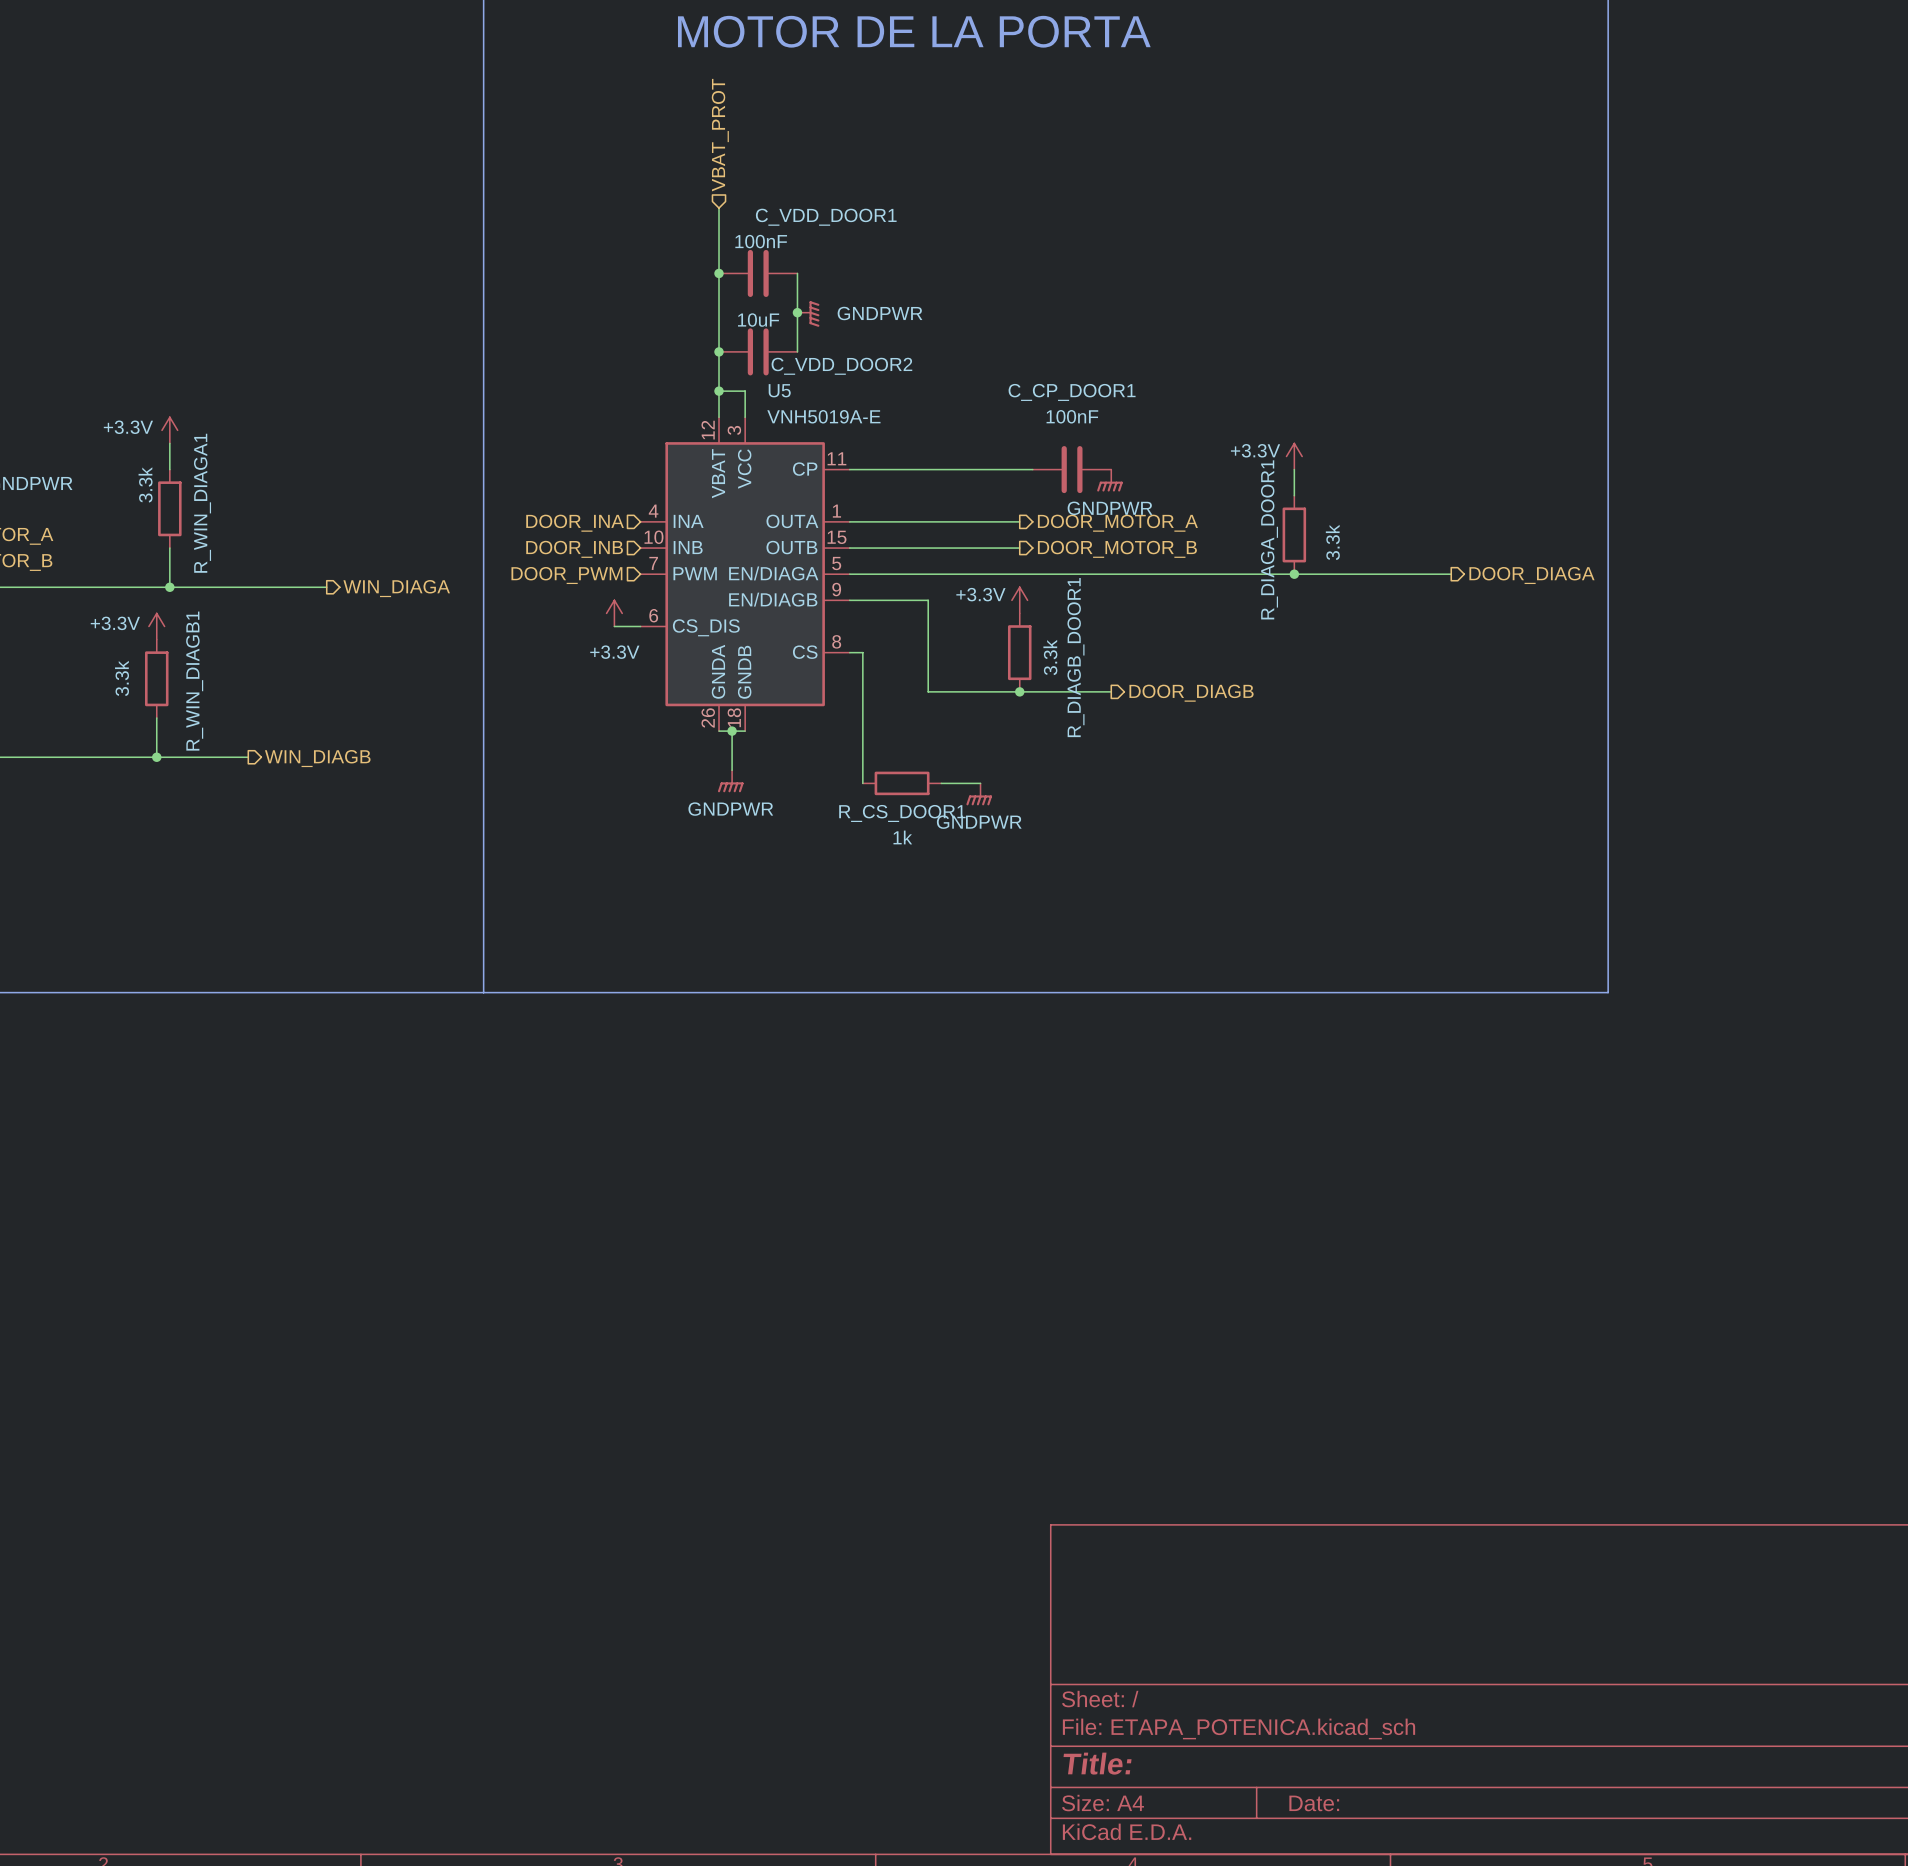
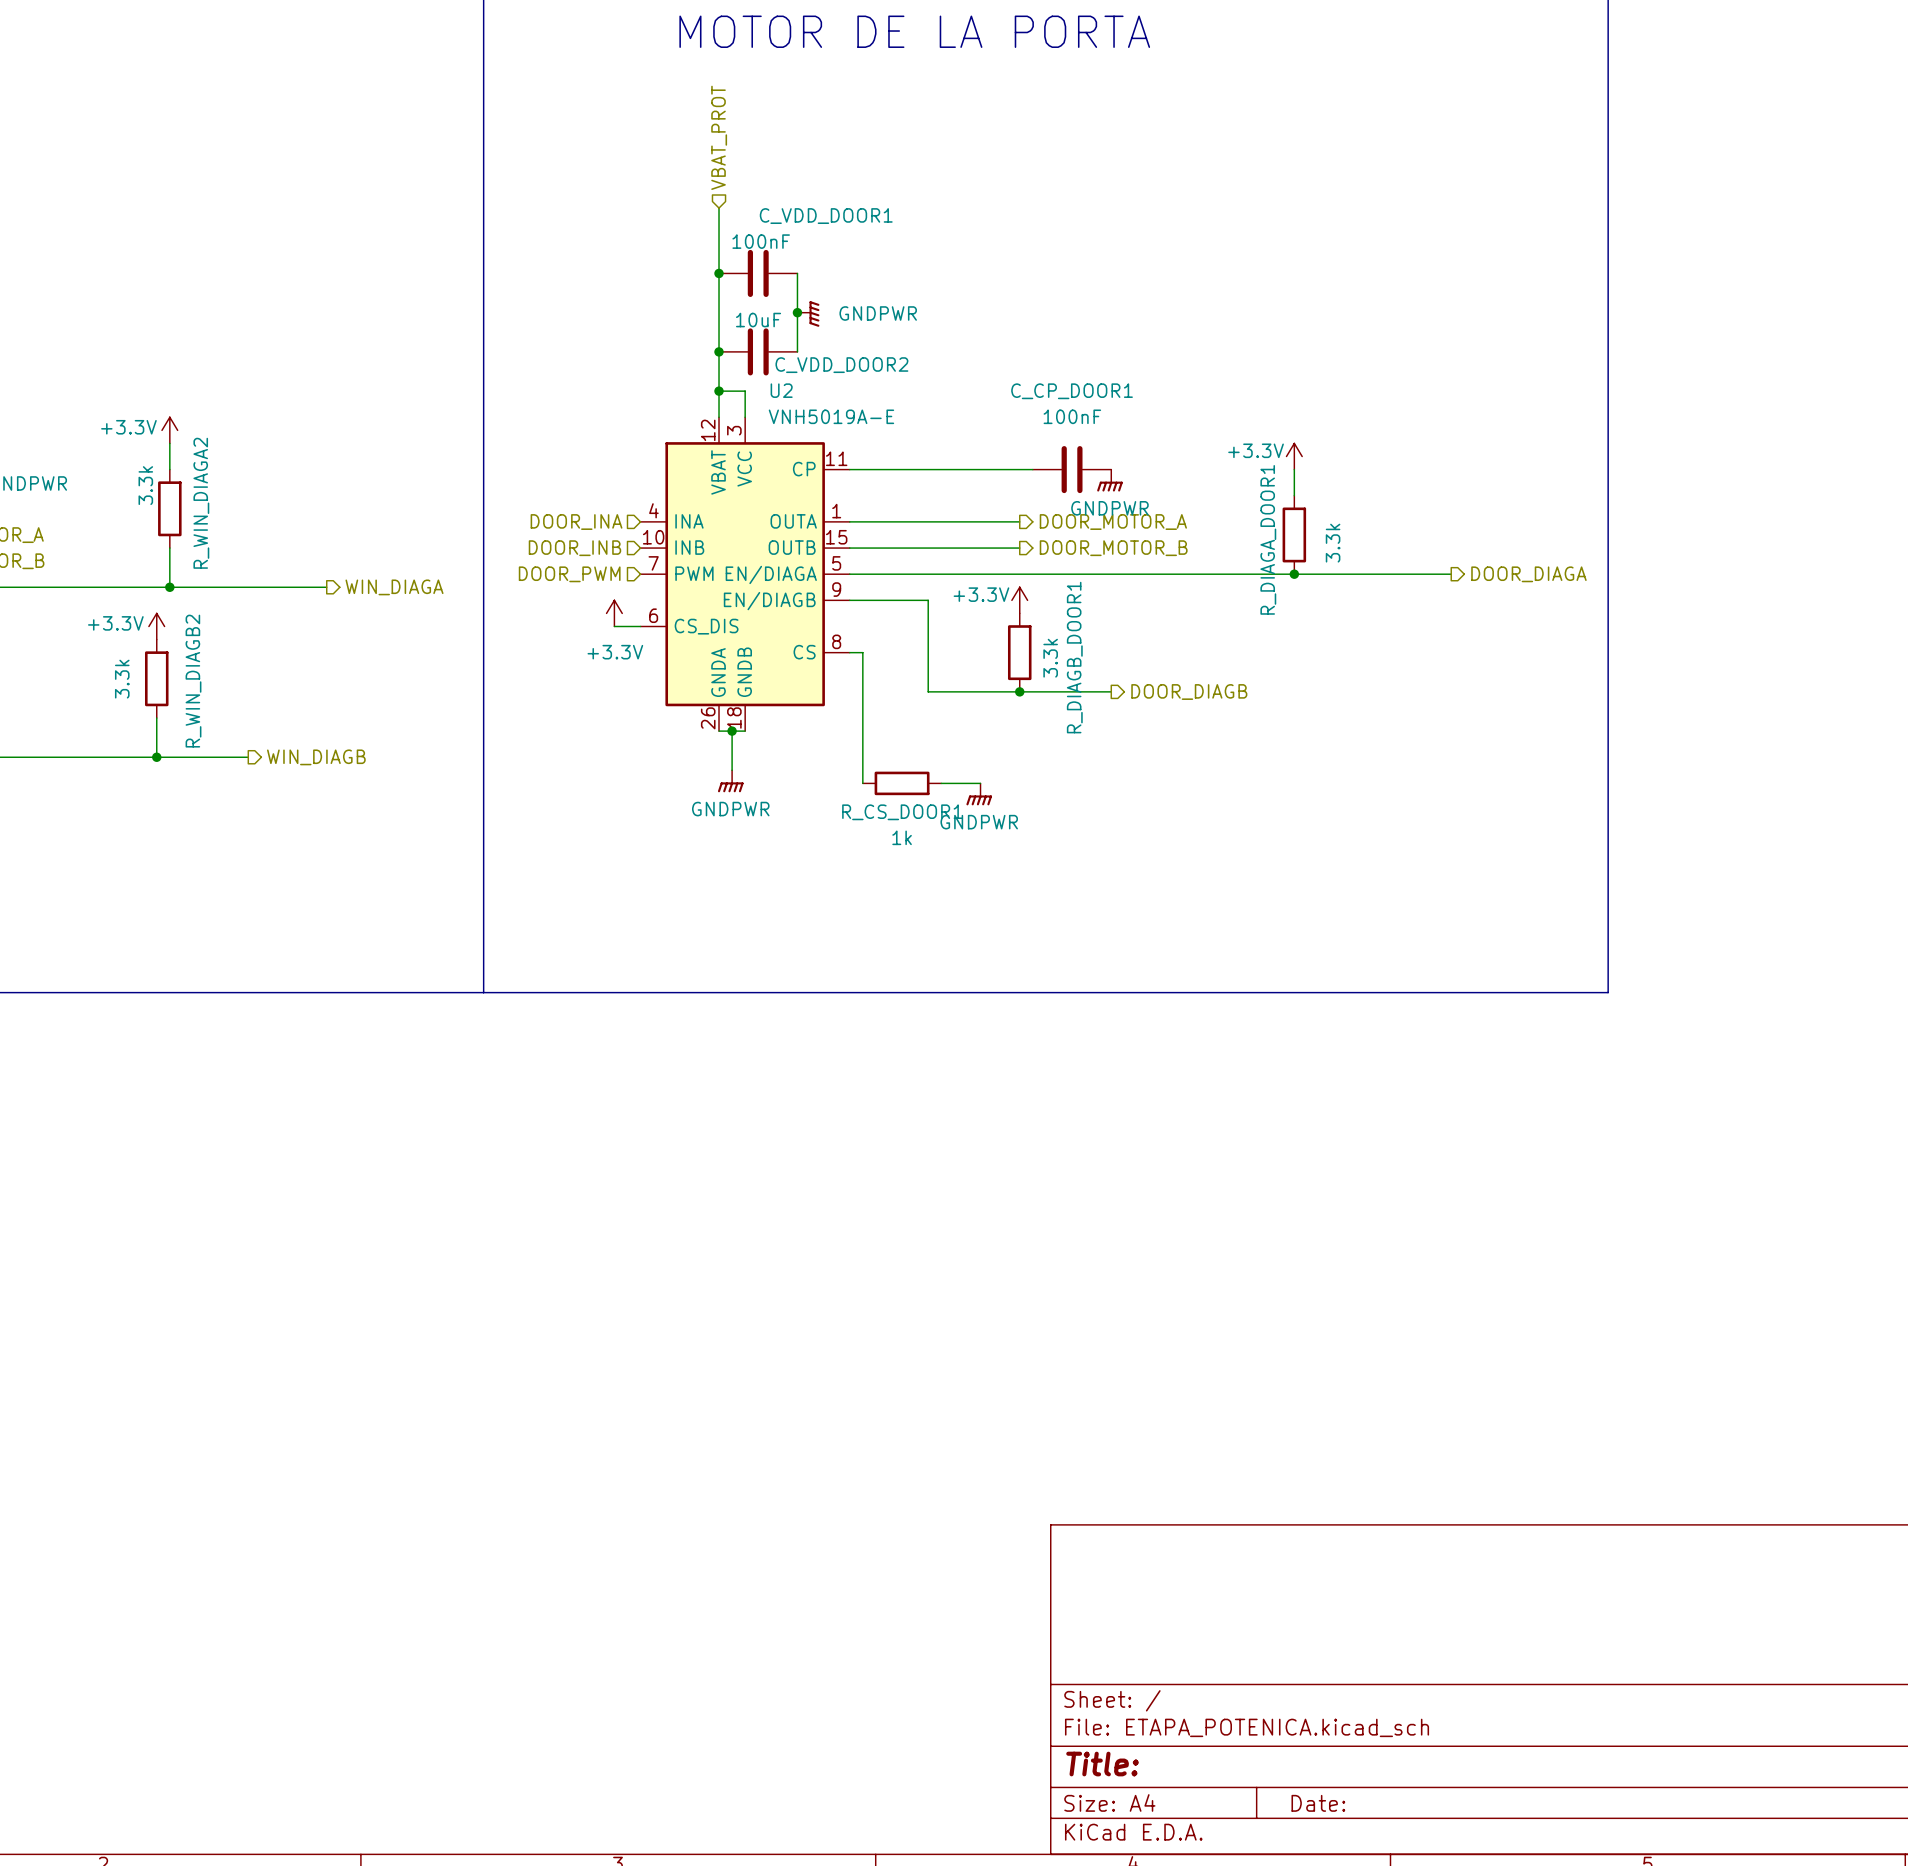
U5 name: U5 (779, 390) -> U2 (781, 390)
R_WIN_DIAGA1 name: R_WIN_DIAGA1 (202, 503) -> R_WIN_DIAGA2 (201, 503)
R_WIN_DIAGB1 name: R_WIN_DIAGB1 (194, 681) -> R_WIN_DIAGB2 (193, 681)

